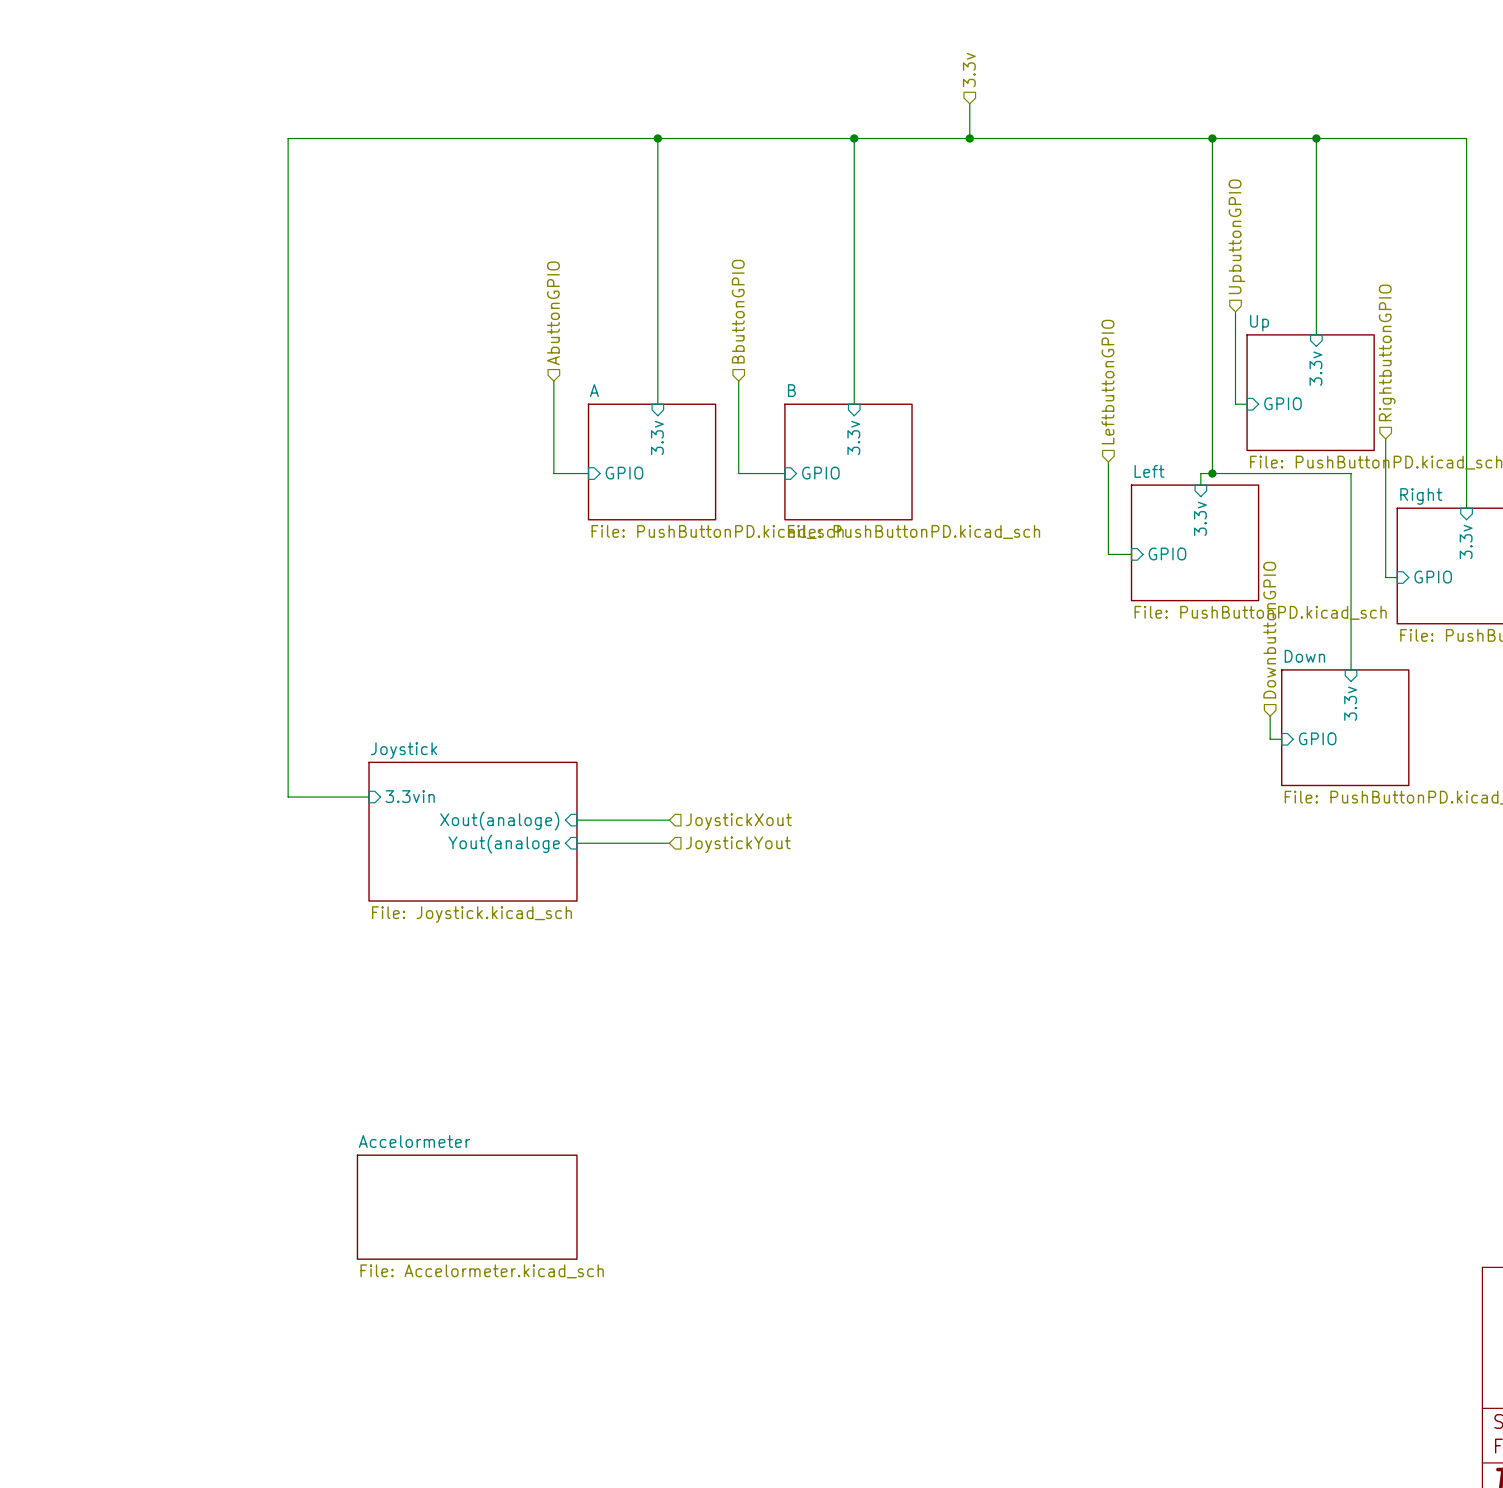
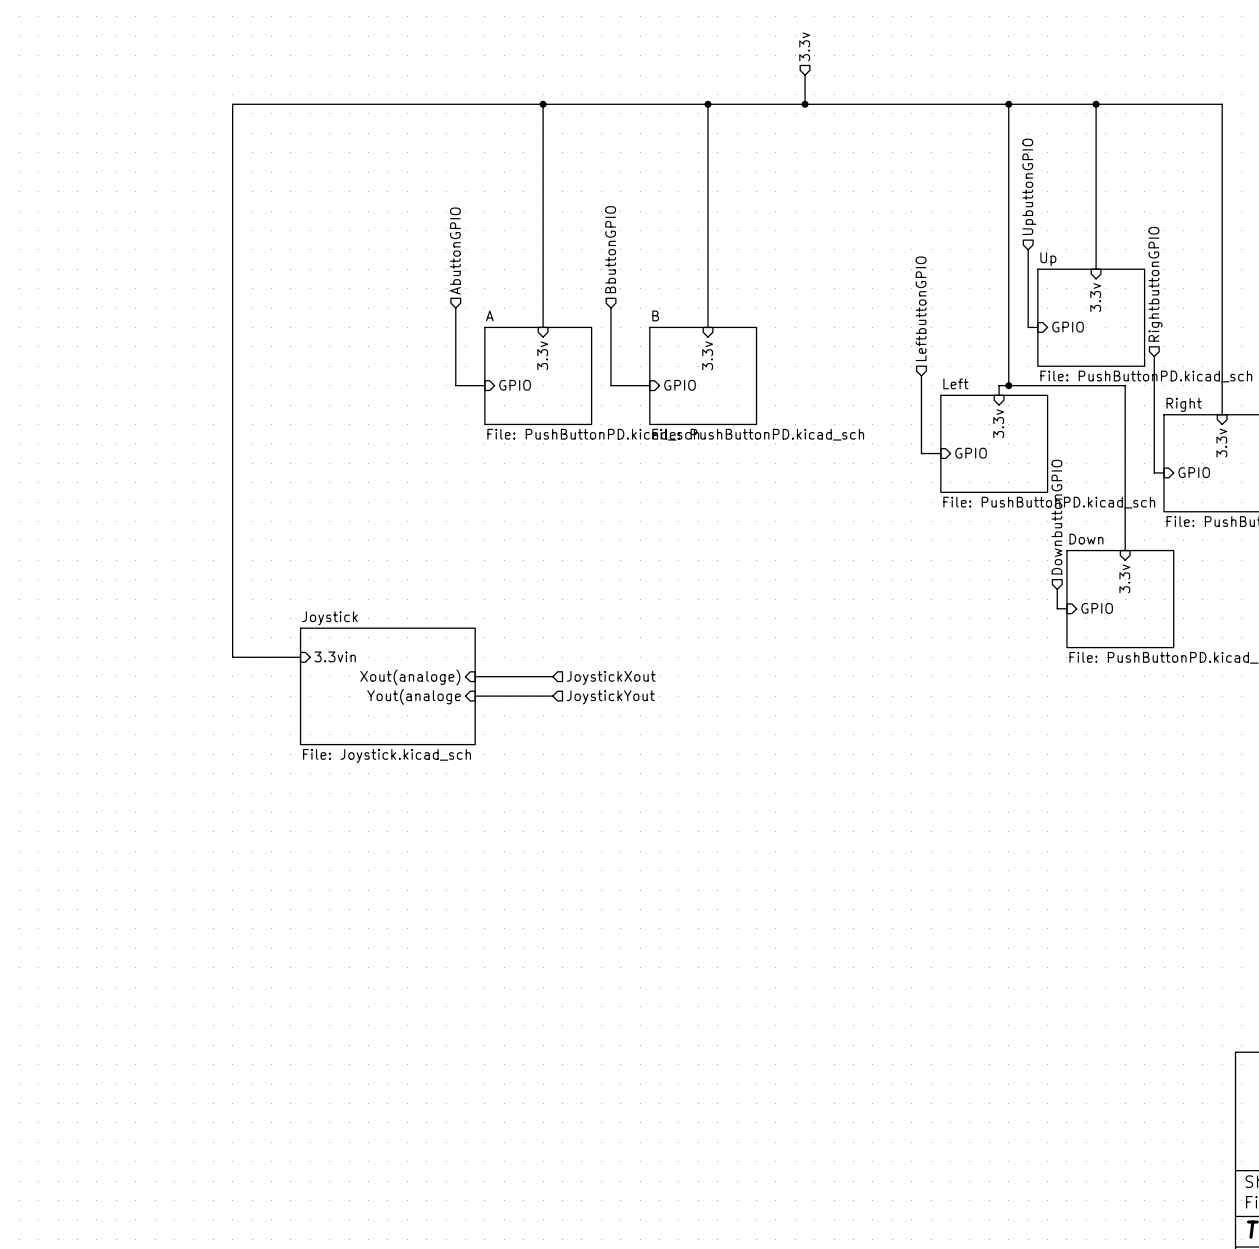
sheet Accelormeter: File: Accelormeter.kicad_sch (467, 1207) -> none

